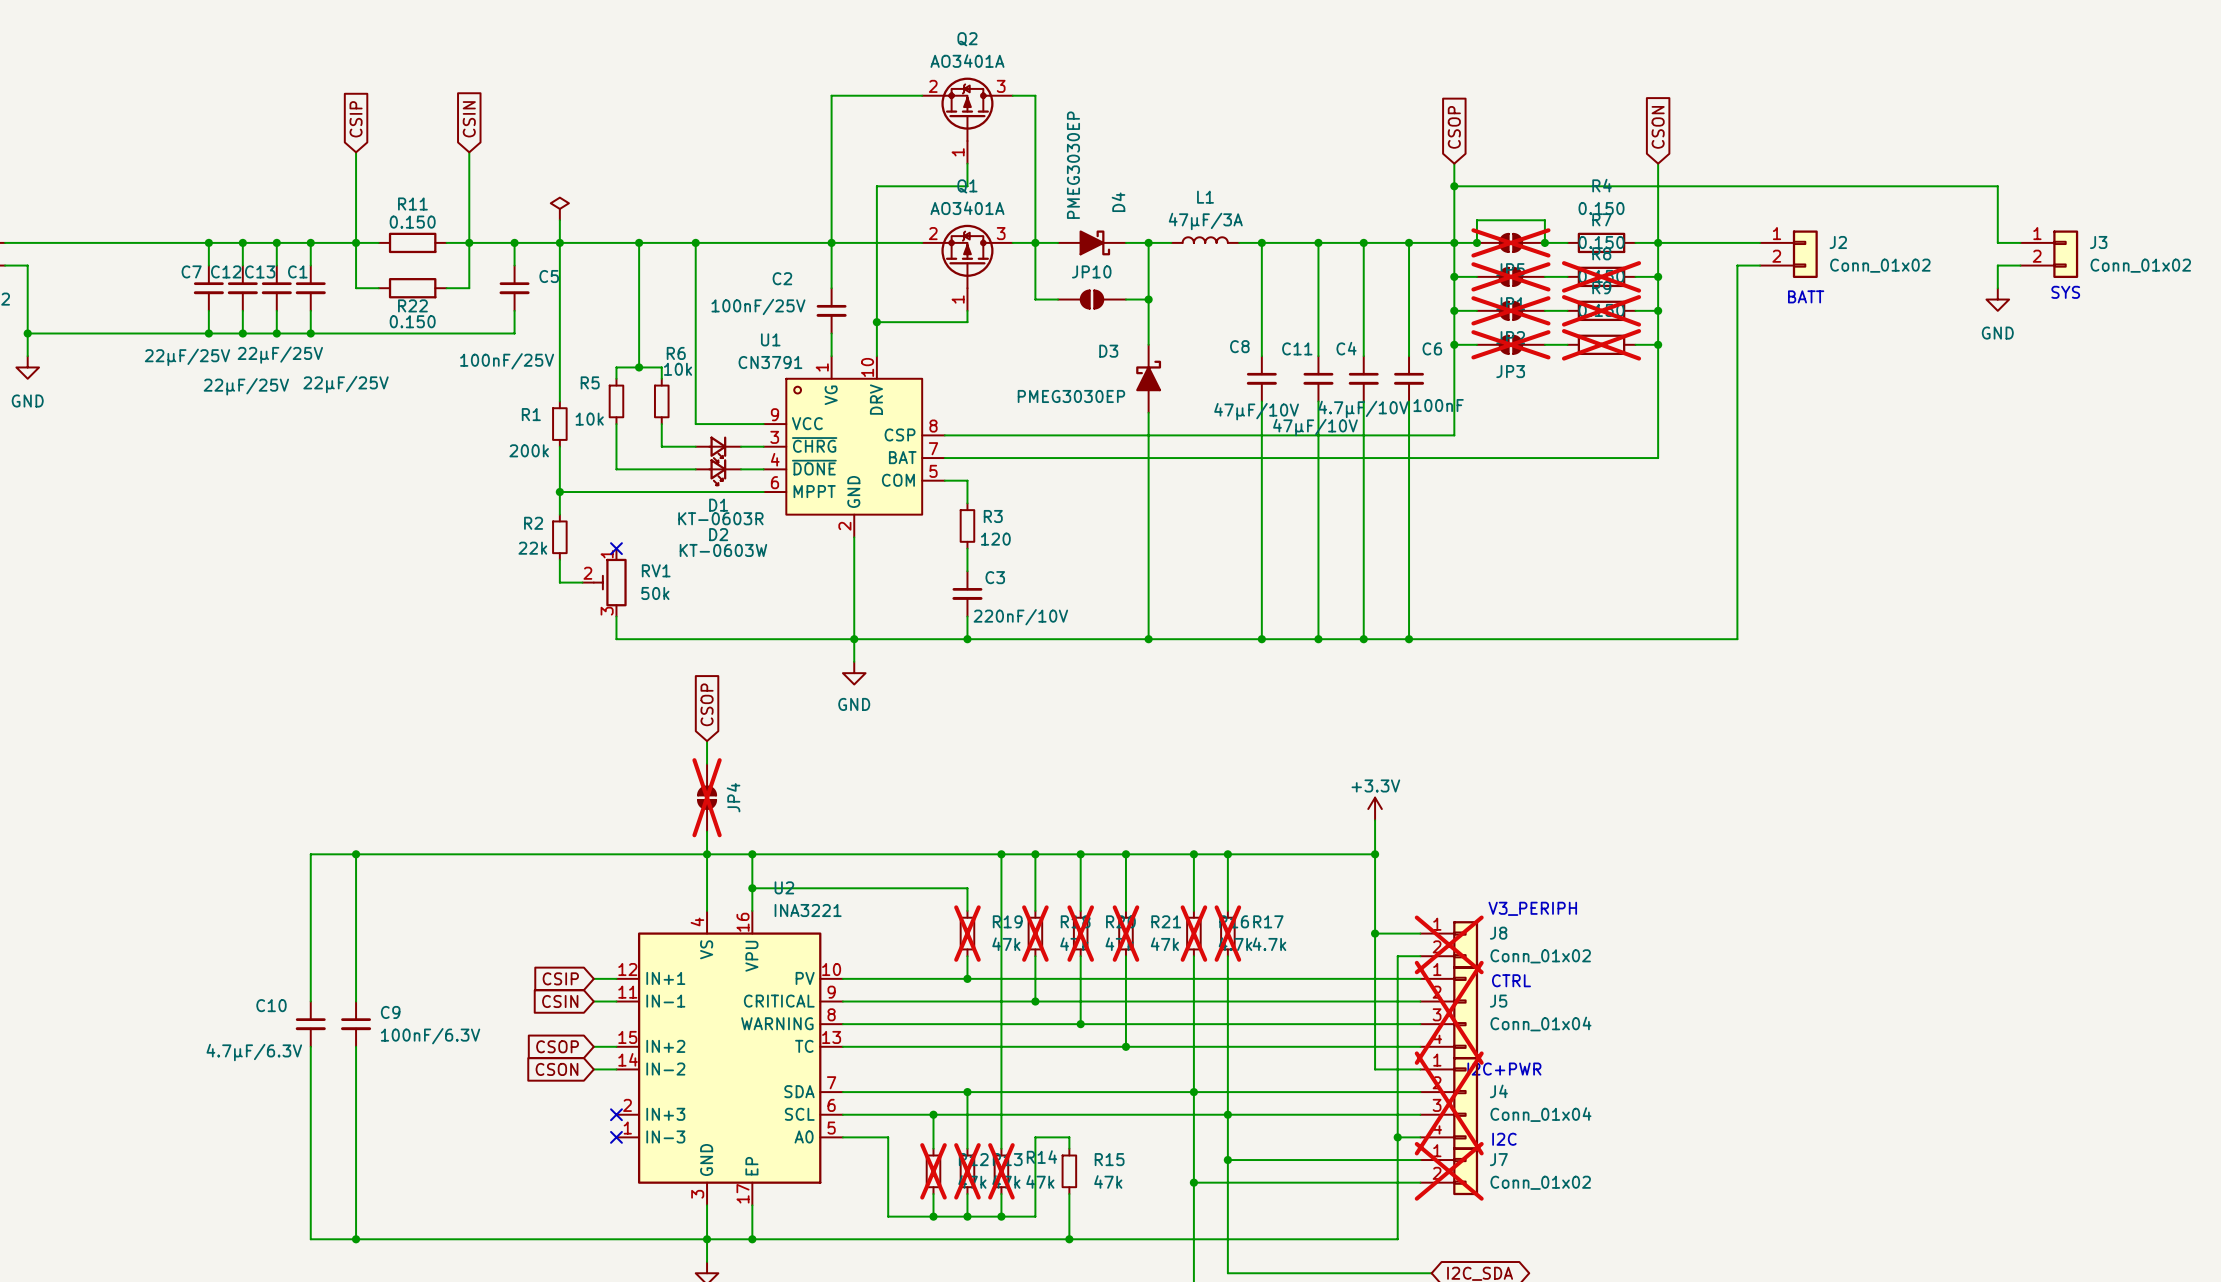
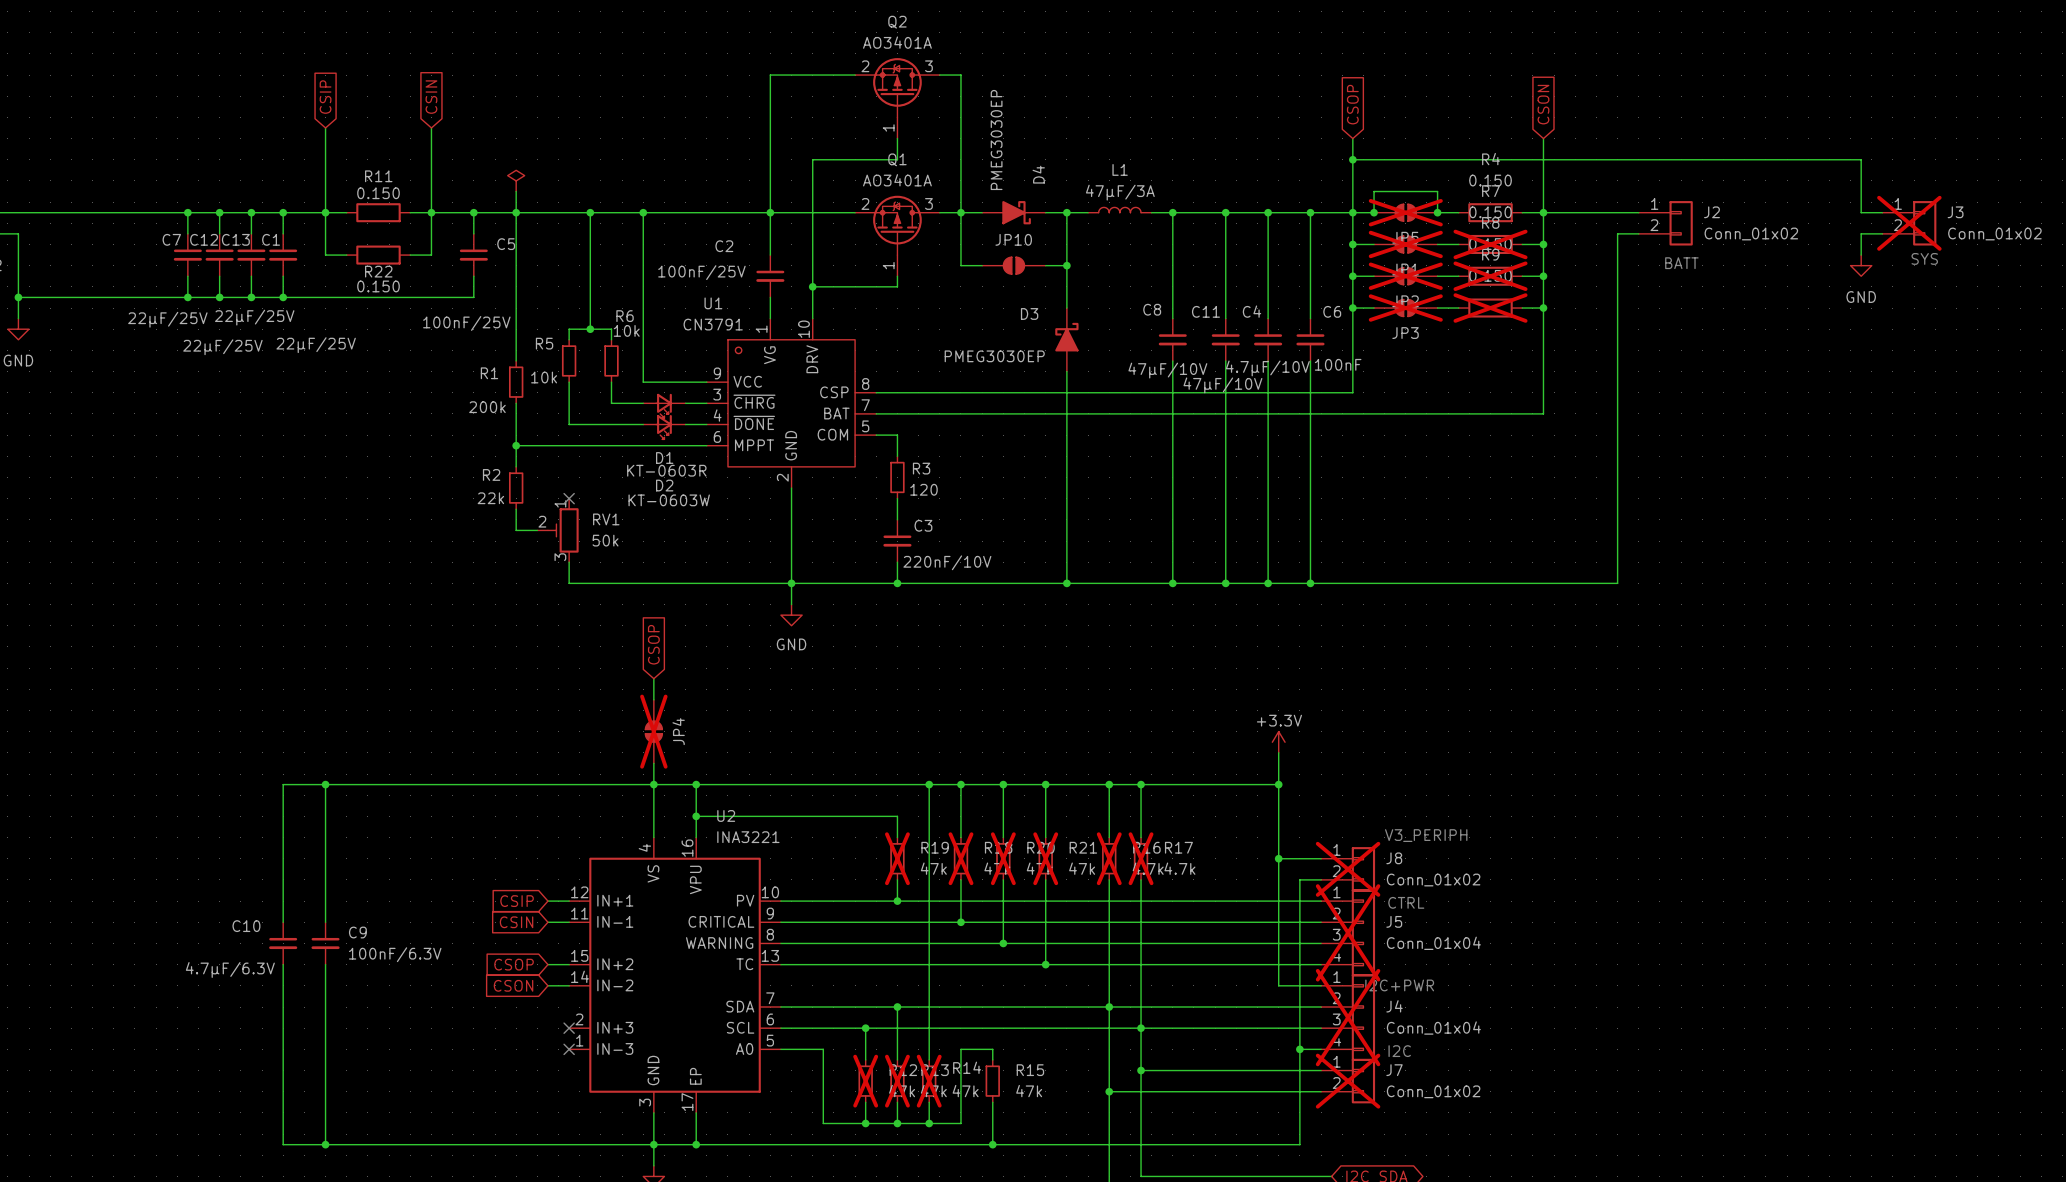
J3 do-not-place cross: none -> (1909, 223)

